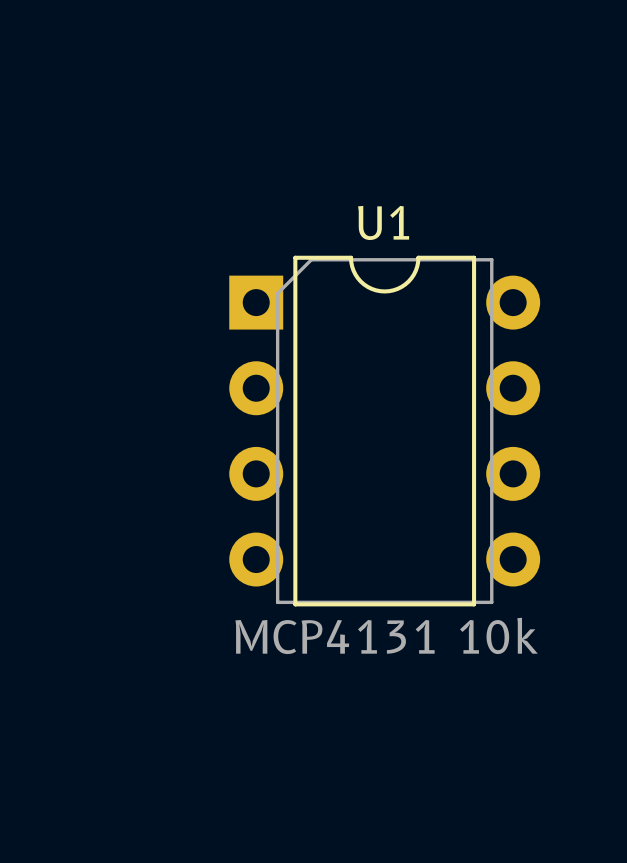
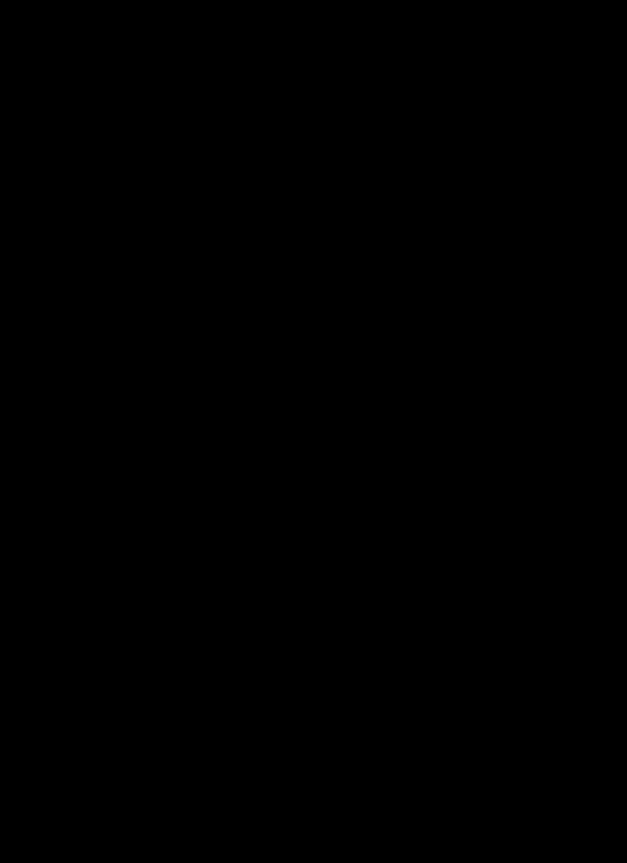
U1: MCP4131 10k (384, 431) -> none

